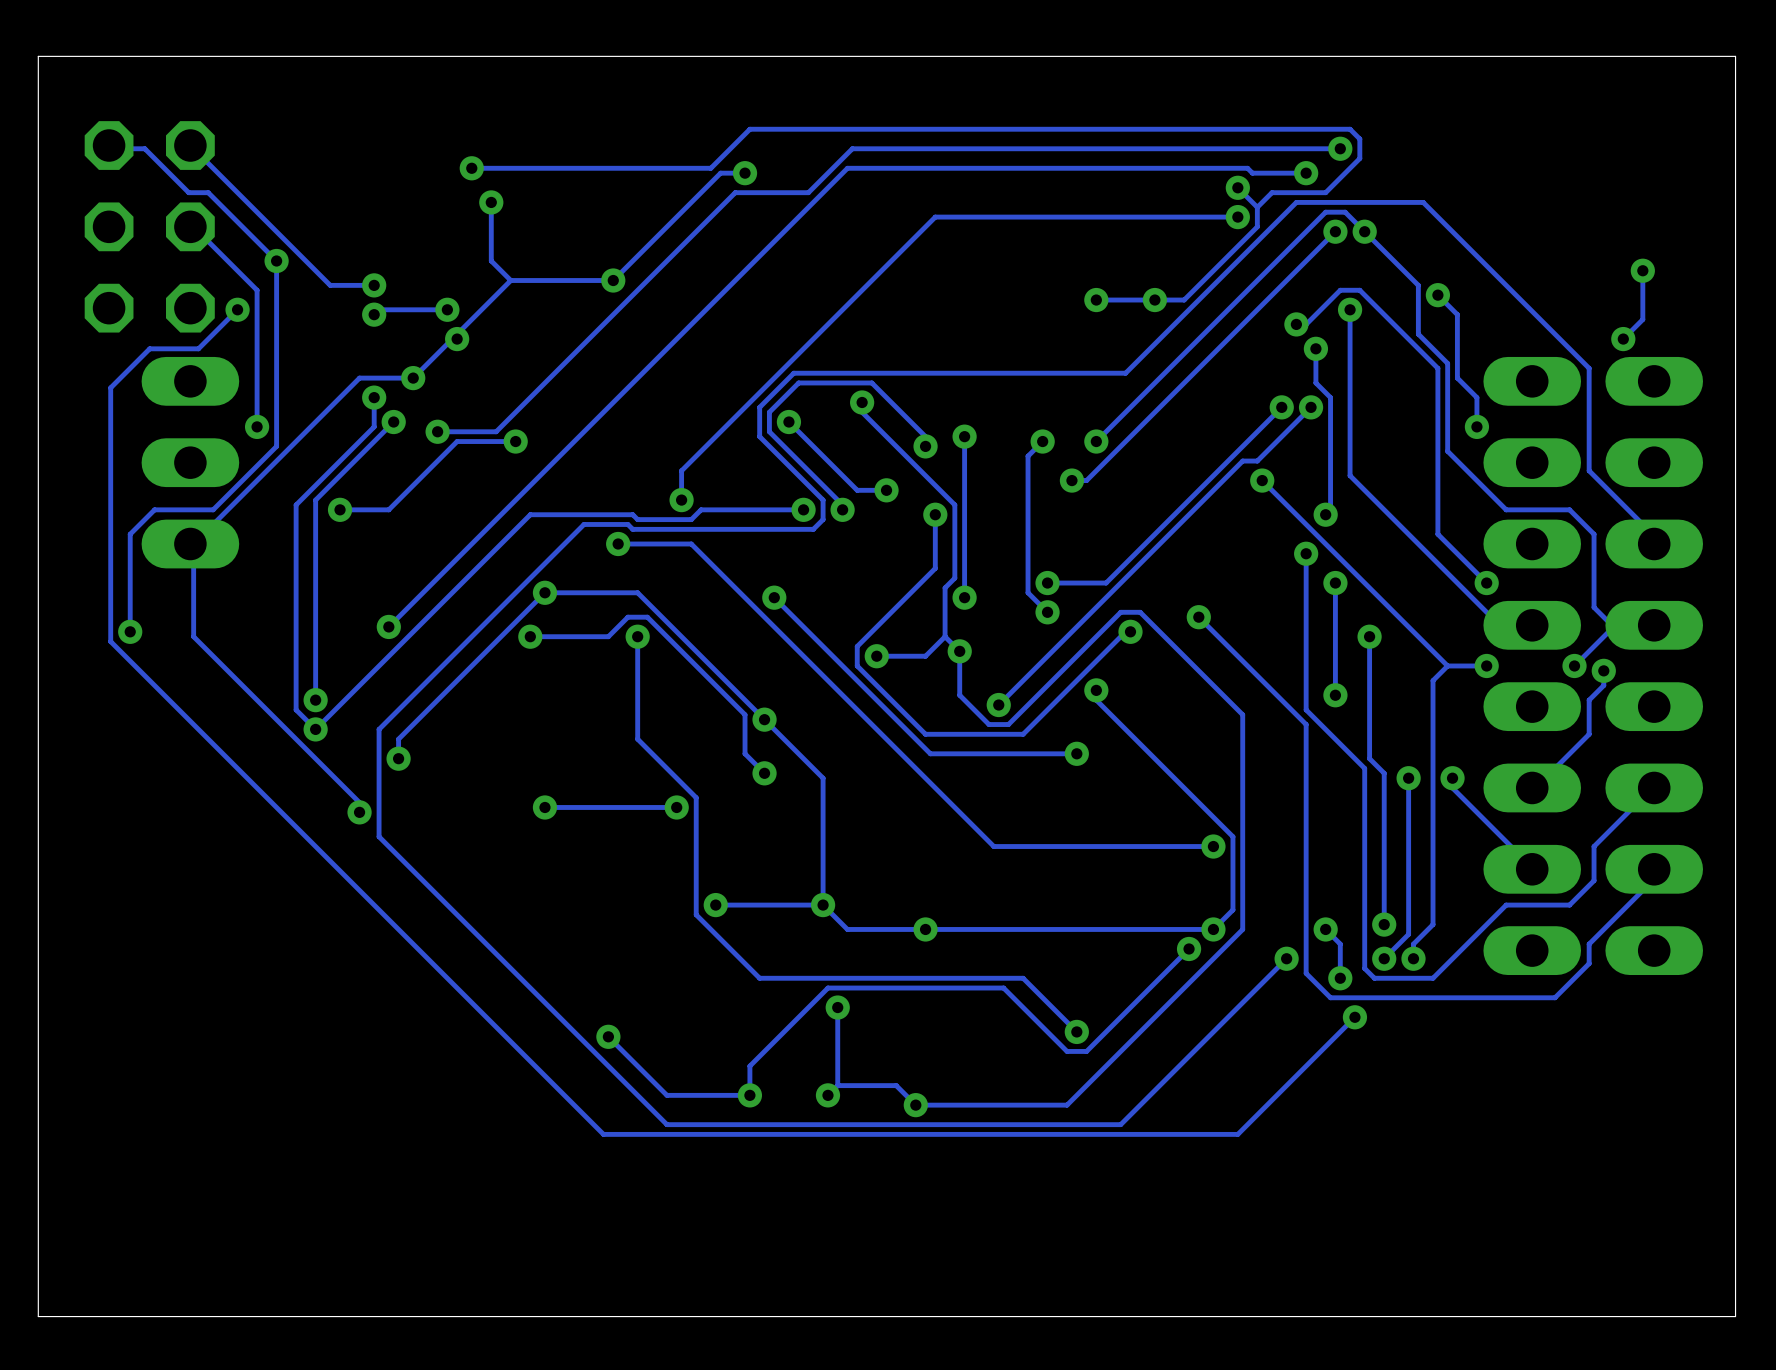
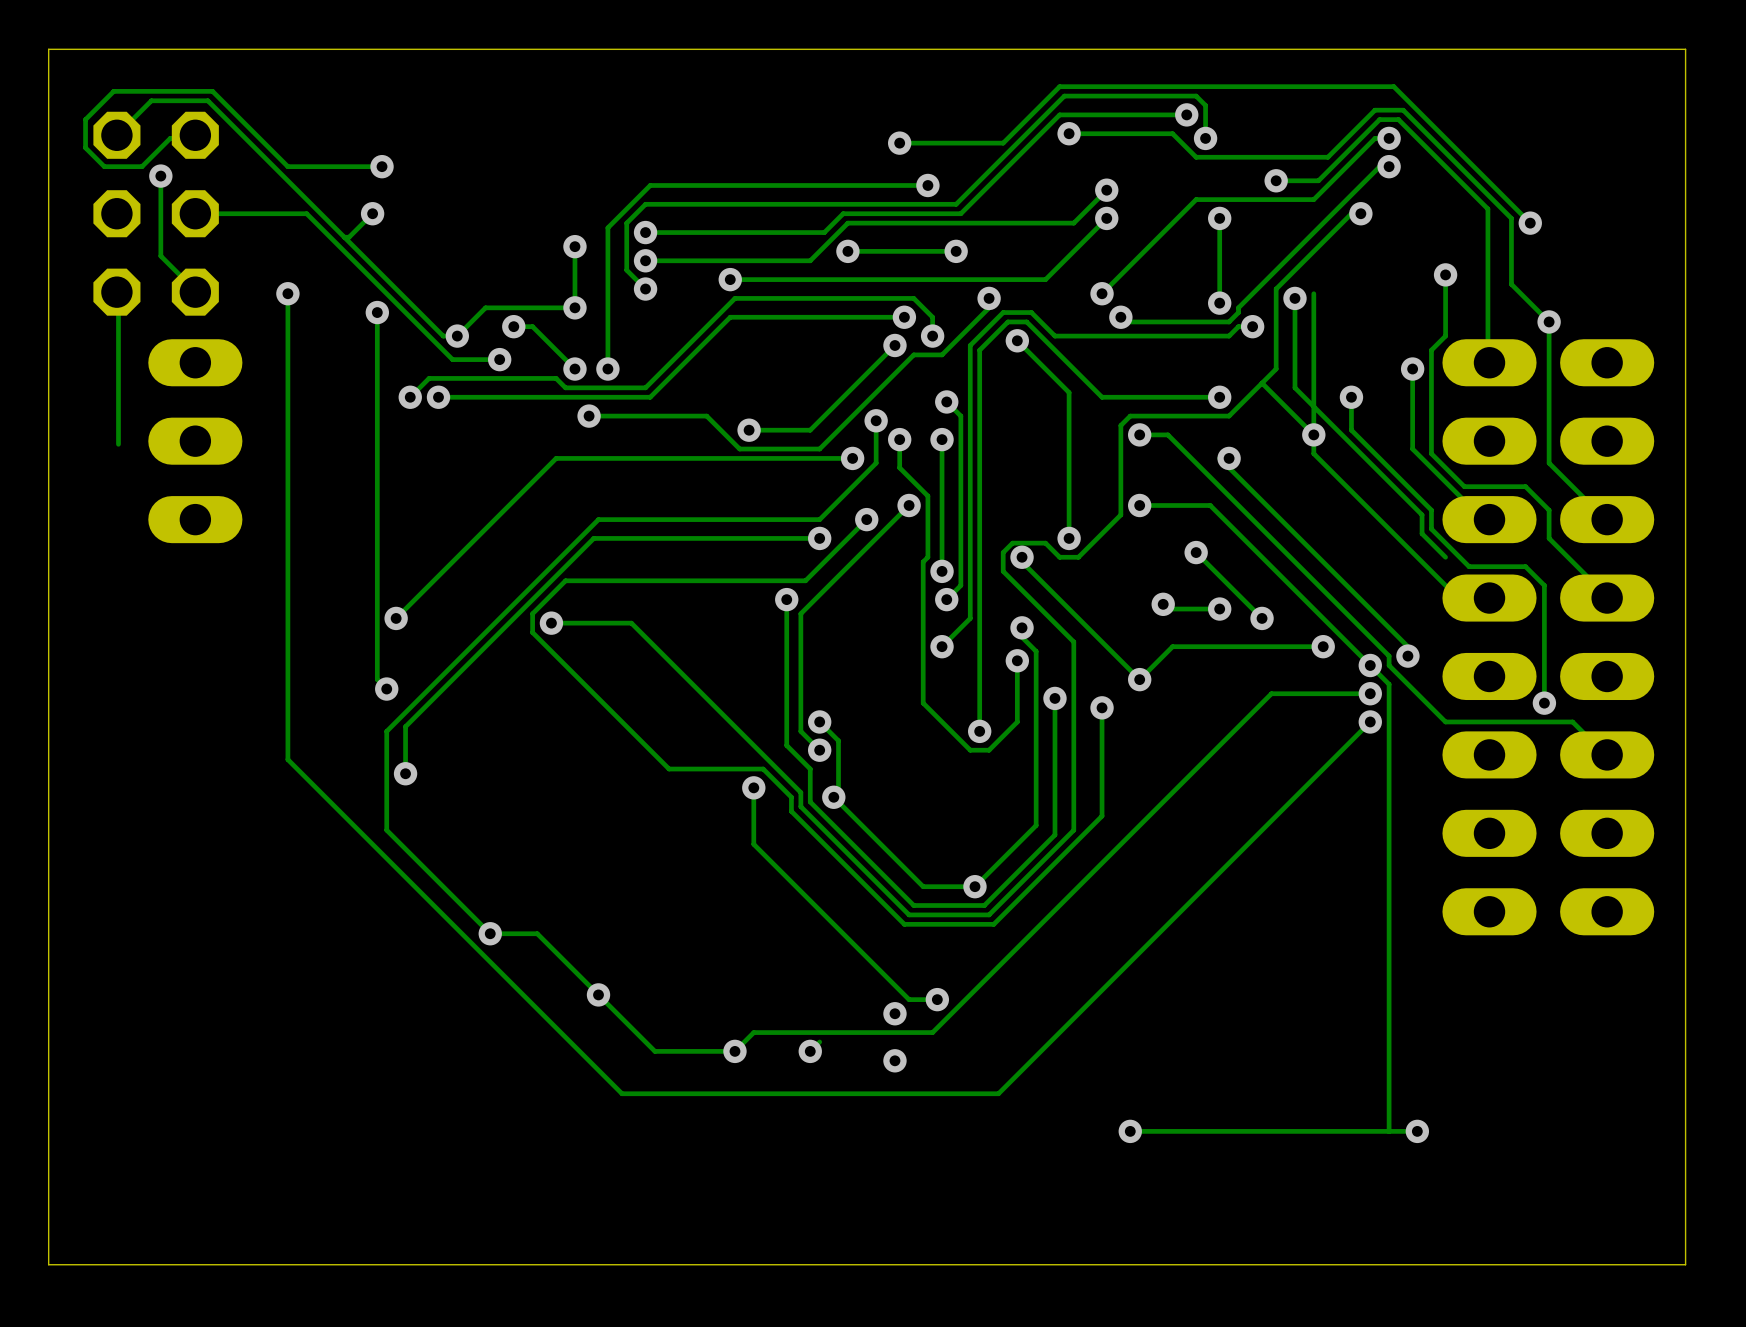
track: none -> (1186, 114) (1059, 114) (960, 213) (843, 213) (824, 232) (645, 232)
via: none -> (1186, 114)
via: none -> (1069, 133)
track: (109, 145) (110, 148) (144, 148) (188, 192) (208, 192) (276, 260) (276, 446) (213, 509) (154, 509) (130, 534) (130, 631) -> (116, 135) (151, 100) (207, 100) (443, 336) (457, 336) (485, 307) (574, 307) (574, 246)
track: (190, 145) (330, 285) (374, 285) -> (195, 135) (193, 138) (170, 138) (142, 166) (104, 166) (85, 147) (85, 119) (113, 91) (212, 91) (287, 166) (382, 166)
via: none -> (1205, 138)
track: (1340, 148) (852, 148) (808, 192) (735, 192) (496, 431) (437, 431) -> none
via: (1340, 148) -> none
track: none -> (1389, 138) (1374, 138) (1313, 199) (1309, 199)
via: none -> (1389, 138)
track: none -> (899, 143) (1003, 143) (1059, 86) (1393, 86) (1530, 223)
via: none -> (899, 143)
track: (471, 168) (710, 168) (749, 129) (1350, 129) (1359, 139) (1359, 158) (1325, 192) -> (1489, 362) (1487, 359) (1487, 209) (1398, 119) (1379, 119) (1318, 180) (1290, 180)
via: (471, 168) -> none
track: (1228, 168) (847, 168) (388, 626) -> (1196, 157) (1172, 133) (1069, 133)
track: (1247, 168) (1252, 173) (1306, 173) -> (1163, 604) (1167, 609) (1219, 609)
track: (745, 173) (720, 173) (613, 280) (510, 280) -> none
via: (745, 173) -> none
via position: (1306, 173) -> (1276, 180)
via: none -> (382, 166)
track: none -> (1389, 166) (1379, 166) (1238, 307) (1238, 312) (1229, 321) (1125, 321) (1120, 317)
via: none -> (1389, 166)
track: none -> (160, 176) (160, 256) (195, 292)
via: none -> (160, 176)
track: (1237, 187) (1257, 207) -> none
via: (1237, 187) -> none
track: (1311, 192) (1272, 192) (1257, 207) -> none
track: none -> (927, 185) (650, 185) (607, 227) (607, 369)
via: none -> (927, 185)
track: (491, 202) (491, 260) (510, 280) -> none
via: (491, 202) -> none
track: none -> (1106, 190) (1073, 223) (847, 223) (810, 260) (645, 260)
via: none -> (1106, 190)
track: (1257, 207) (1257, 226) (1184, 300) (1096, 300) -> none
track: (1325, 212) (1096, 441) -> (1290, 199) (1196, 199) (1102, 293)
track: (1345, 212) (1418, 285) (1418, 334) (1447, 363) (1447, 451) (1472, 475) -> (1445, 274) (1445, 336) (1431, 350) (1431, 453)
track: (935, 217) (681, 470) (681, 500) -> (913, 204) (645, 204) (626, 223) (626, 270) (645, 289)
track: (1237, 217) (979, 217) -> (1205, 138) (1205, 105) (1196, 96) (1064, 96) (956, 204)
via position: (1237, 217) -> (1219, 218)
track: (193, 226) (257, 290) (257, 426) -> (198, 213) (306, 213) (452, 359) (499, 359)
track: none -> (372, 213) (349, 237) (344, 237)
via: none -> (372, 213)
via: none -> (1360, 213)
track: none -> (1106, 218) (1045, 279) (730, 279)
via: none -> (1106, 218)
track: none -> (1219, 218) (1219, 303)
track: (1335, 231) (1086, 480) (1071, 480) -> none
via: (1335, 231) -> none
via: (1364, 231) -> none
via: none -> (1530, 223)
via: none -> (645, 232)
via: (276, 260) -> none
via: none -> (574, 246)
via: none -> (847, 251)
track: none -> (956, 251) (847, 251)
via: none -> (956, 251)
track: (1642, 270) (1642, 319) (1623, 339) -> none
via: (1642, 270) -> none
via: none -> (645, 260)
track: (510, 280) (413, 378) (359, 378) (193, 544) (193, 636) (359, 802) (359, 812) -> none
via: (613, 280) -> none
via: (374, 285) -> none
via: none -> (1445, 274)
via: none -> (730, 279)
track: (1437, 295) (1457, 314) (1457, 378) (1476, 397) (1476, 426) -> none
via: (1437, 295) -> none
via: (1096, 300) -> none
via: (1154, 300) -> none
via: none -> (645, 289)
track: (237, 309) (198, 348) (149, 348) (110, 387) -> (116, 292) (118, 293) (118, 369)
via: (237, 309) -> none
track: none -> (287, 293) (287, 759) (622, 1093) (998, 1093) (1370, 721)
via: none -> (287, 293)
track: (447, 309) (379, 309) (374, 314) -> none
via: (447, 309) -> none
via: none -> (1102, 293)
via position: (1350, 309) -> (1294, 298)
via position: (374, 314) -> (377, 312)
track: none -> (989, 298) (989, 307) (942, 354)
via: none -> (989, 298)
via: none -> (1219, 303)
via: none -> (574, 307)
track: (1296, 324) (1306, 324) (1340, 290) (1359, 290) (1437, 368) (1437, 534) (1462, 558) -> (1294, 387) (1422, 514) (1422, 533)
via position: (1296, 324) -> (1252, 326)
track: none -> (377, 312) (377, 679) (386, 689)
track: none -> (904, 317) (730, 317) (650, 397) (438, 397)
via: none -> (904, 317)
via: none -> (1120, 317)
via position: (457, 339) -> (457, 336)
via position: (1623, 339) -> (1549, 321)
track: none -> (513, 326) (532, 326) (574, 369)
via: none -> (513, 326)
track: none -> (1252, 326) (1238, 326) (1229, 336) (1054, 336) (1031, 312) (1003, 312) (970, 345) (970, 618) (942, 646)
track: (1315, 348) (1315, 382) (1330, 397) -> (1294, 298) (1294, 378)
via: (1315, 348) -> none
track: none -> (932, 336) (932, 317) (913, 298) (734, 298) (645, 387) (565, 387) (556, 378) (429, 378) (410, 397)
via: none -> (932, 336)
track: none -> (1017, 340) (1069, 392) (1069, 538)
via: none -> (1017, 340)
track: none -> (894, 345) (810, 430) (749, 430)
via: none -> (894, 345)
track: (935, 373) (793, 373) (759, 407) (759, 436) (823, 500) (823, 519) (813, 529) (632, 529) (627, 524) (584, 524) (379, 729) (379, 836) (666, 1124) (1120, 1124) (1286, 958) -> (913, 354) (819, 449) (739, 449) (706, 416) (589, 416)
track: (964, 373) (1125, 373) (1296, 202) (1423, 202) (1589, 368) (1589, 470) (1652, 534) (1652, 544) -> (1214, 157) (1327, 157) (1374, 110) (1403, 110) (1511, 218) (1511, 284) (1549, 321) (1549, 463) (1605, 519)
via: (413, 378) -> none
via: none -> (499, 359)
via: none -> (574, 369)
via: none -> (607, 369)
track: none -> (1412, 369) (1412, 449) (1483, 519) (1489, 519)
via: none -> (1412, 369)
track: (374, 397) (374, 426) (296, 504) (296, 709) (315, 729) (398, 646) -> none
via: (374, 397) -> none
track: (862, 402) (862, 412) (954, 504) (954, 578) (949, 583) -> (899, 439) (899, 467) (927, 496) (927, 557)
via: (862, 402) -> none
track: none -> (1262, 383) (1313, 434)
track: (1281, 407) (1150, 539) -> (1360, 213) (1351, 213) (1276, 289) (1276, 369) (1229, 416) (1130, 416) (1120, 425) (1120, 514)
via: (1281, 407) -> none
track: (1311, 407) (1257, 461) (1242, 461) (998, 705) -> none
via: (1311, 407) -> none
track: (1330, 407) (1330, 509) (1325, 514) -> none
track: none -> (1219, 397) (1102, 397) (1026, 321) (1007, 321) (979, 350) (979, 731)
via: none -> (1219, 397)
via: none -> (1351, 397)
track: (393, 422) (315, 500) (315, 700) -> none
via position: (393, 422) -> (410, 397)
track: (788, 422) (857, 490) (886, 490) -> none
via: (788, 422) -> none
track: none -> (946, 401) (960, 416) (960, 585) (946, 599)
via: (257, 426) -> none
via: (1476, 426) -> none
via position: (437, 431) -> (438, 397)
via: none -> (589, 416)
track: (964, 436) (964, 461) -> none
via position: (964, 436) -> (946, 401)
track: (515, 441) (457, 441) (388, 509) (340, 509) -> none
via: (515, 441) -> none
via: none -> (876, 420)
track: (1042, 441) (1028, 456) (1028, 578) -> none
via: (1042, 441) -> none
via: (1096, 441) -> none
track: (925, 446) (925, 436) (871, 382) (798, 382) (769, 412) (769, 431) (842, 504) (842, 509) -> none
via position: (925, 446) -> (899, 439)
via: none -> (749, 430)
via: none -> (1139, 434)
via: none -> (1313, 434)
via: none -> (942, 439)
track: (110, 465) (110, 641) (603, 1134) (1237, 1134) (1354, 1017) -> none
via: (1071, 480) -> none
track: none -> (1219, 458) (1407, 646) (1407, 656)
track: (1262, 480) (1447, 665) -> none
via position: (886, 490) -> (852, 458)
via: (681, 500) -> none
via: (340, 509) -> none
track: (803, 509) (701, 509) (691, 519) (637, 519) (632, 514) (530, 514) -> (852, 458) (556, 458) (523, 491)
via: (803, 509) -> none
via: (842, 509) -> none
track: (935, 514) (935, 568) (857, 646) (857, 665) (925, 734) (1023, 734) (1125, 631) (1130, 631) -> none
via position: (935, 514) -> (909, 505)
via: (1325, 514) -> none
track: none -> (909, 505) (800, 613) (800, 731) (819, 750)
track: none -> (1139, 505) (1210, 505) (1389, 684) (1389, 1131)
via: none -> (1139, 505)
track: none -> (607, 519) (598, 519) (386, 731) (386, 830) (490, 933) (537, 933) (598, 994)
via: (618, 544) -> none
track: (691, 544) (993, 846) (1213, 846) -> (678, 519) (819, 519) (876, 463) (876, 420)
track: none -> (866, 519) (805, 580) (565, 580) (532, 613) (532, 632) (669, 769) (763, 769) (791, 797) (791, 811) (904, 924) (993, 924) (1102, 816) (1102, 707)
via: none -> (866, 519)
track: (1306, 553) (1306, 709) (1364, 768) (1364, 968) (1374, 978) (1433, 978) (1506, 905) (1569, 905) (1594, 880) (1594, 846) (1652, 787) -> (1139, 434) (1167, 434) (1389, 656) (1389, 665) (1445, 721) (1572, 721) (1605, 754)
via: (1306, 553) -> none
track: none -> (819, 538) (593, 538) (405, 726) (405, 773)
via: none -> (819, 538)
via: none -> (1069, 538)
track: (1594, 563) (1594, 607) (1613, 626) -> (1549, 538) (1607, 598)
track: none -> (1196, 552) (1262, 618)
via: none -> (1196, 552)
track: (1086, 583) (1047, 583) -> (1059, 557) (1045, 543) (1012, 543) (1003, 552)
track: (1335, 583) (1335, 695) -> none
via: (1335, 583) -> none
via: (1486, 583) -> none
track: none -> (1022, 561) (1139, 679) (1172, 646) (1323, 646)
via: (544, 592) -> none
track: (1028, 592) (1047, 612) -> (1003, 566) (1003, 571) (1073, 641) (1073, 830) (989, 914) (909, 914) (800, 806) (800, 792) (749, 740)
track: (774, 597) (930, 753) (1076, 753) -> none
via: (774, 597) -> none
via: (1047, 612) -> none
track: (1198, 617) (1306, 724) (1306, 973) (1330, 997) (1555, 997) (1589, 963) (1589, 944) (1652, 880) (1654, 869) -> none
via position: (1198, 617) -> (1163, 604)
via position: (388, 626) -> (396, 618)
track: none -> (786, 599) (786, 745) (810, 769) (810, 801) (913, 905) (984, 905) (1054, 834) (1054, 698)
via: none -> (786, 599)
via: none -> (946, 599)
track: (1613, 626) (1574, 665) -> none
via: (130, 631) -> none
via: (1130, 631) -> none
track: (530, 636) (608, 636) (627, 617) (647, 617) (745, 714) (745, 753) -> (551, 623) (631, 623) (730, 721)
via: (530, 636) -> none
track: (637, 636) (637, 739) (696, 797) (696, 914) (759, 978) (1023, 978) (1076, 1031) -> none
via: (637, 636) -> none
track: none -> (923, 609) (923, 703) (970, 750) (989, 750) (1017, 721) (1017, 660)
via: none -> (1219, 609)
track: (1369, 636) (1369, 758) (1384, 773) (1384, 924) -> none
via: (1369, 636) -> none
via: none -> (1262, 618)
via: none -> (551, 623)
via: (959, 651) -> none
track: (876, 656) (925, 656) (945, 636) (959, 651) (959, 695) (988, 724) (1008, 724) (1120, 612) (1140, 612) (1242, 714) (1242, 929) (1067, 1105) (915, 1105) (896, 1085) (837, 1085) (837, 1007) -> none
via: (876, 656) -> none
track: none -> (1022, 627) (1022, 637) (1036, 651) (1036, 825) (974, 886) (923, 886) (833, 797)
via: none -> (1022, 627)
track: (1447, 665) (1433, 680) (1433, 924) (1413, 944) (1413, 958) -> none
track: (1486, 665) (1447, 665) -> none
via: (1486, 665) -> none
via: (1574, 665) -> none
track: (1603, 670) (1603, 685) (1589, 700) -> (1351, 397) (1351, 430) (1431, 510) (1431, 529) (1469, 566) (1525, 566) (1544, 585) (1544, 670)
via: (1603, 670) -> none
via: none -> (942, 646)
via: none -> (1323, 646)
via: none -> (1407, 656)
via: none -> (1017, 660)
track: (1096, 690) (1096, 700) (1232, 836) (1232, 909) (1213, 929) (847, 929) (823, 905) -> none
via: (1096, 690) -> none
via: (1335, 695) -> none
via: none -> (1370, 665)
via: (315, 700) -> none
via: (998, 705) -> none
via: none -> (1139, 679)
via: none -> (386, 689)
via: (764, 719) -> none
via: none -> (1370, 693)
via: (315, 729) -> none
via: none -> (1054, 698)
track: (1589, 734) (1535, 787) (1532, 787) -> none
via: none -> (1544, 703)
via: none -> (1102, 707)
track: none -> (819, 721) (838, 740) (838, 801)
via: none -> (819, 721)
via: (1076, 753) -> none
track: (398, 758) (398, 739) (544, 592) (637, 592) (823, 778) (823, 905) -> none
via: (398, 758) -> none
via: none -> (979, 731)
via: (764, 773) -> none
track: (1408, 778) (1408, 934) (1384, 958) -> none
via position: (1408, 778) -> (1370, 721)
track: (1452, 778) (1452, 787) (1532, 869) -> none
via: (1452, 778) -> none
via: none -> (819, 750)
via: none -> (405, 773)
via: (544, 807) -> none
track: (676, 807) (544, 807) -> none
via: (676, 807) -> none
via: (359, 812) -> none
track: none -> (753, 787) (753, 844) (909, 999) (937, 999)
via: none -> (753, 787)
via: none -> (833, 797)
via: (1213, 846) -> none
via: (715, 905) -> none
track: (823, 905) (715, 905) -> none
via: (823, 905) -> none
via: none -> (974, 886)
via: (1384, 924) -> none
via: (925, 929) -> none
via: (1213, 929) -> none
track: (1325, 929) (1340, 944) (1340, 978) -> none
via: (1325, 929) -> none
track: (1189, 948) (1086, 1051) (1067, 1051) (1003, 988) (827, 988) (749, 1066) (749, 1095) -> (1370, 693) (1271, 693) (932, 1032) (753, 1032) (734, 1051)
via: (1189, 948) -> none
via: (1286, 958) -> none
via: (1384, 958) -> none
via: (1413, 958) -> none
via: none -> (490, 933)
via: (1340, 978) -> none
via: (837, 1007) -> none
via: (1354, 1017) -> none
via: (1076, 1031) -> none
via: none -> (937, 999)
via: none -> (894, 1013)
via: none -> (1130, 1131)
track: none -> (1417, 1131) (1130, 1131)
via: none -> (1417, 1131)

